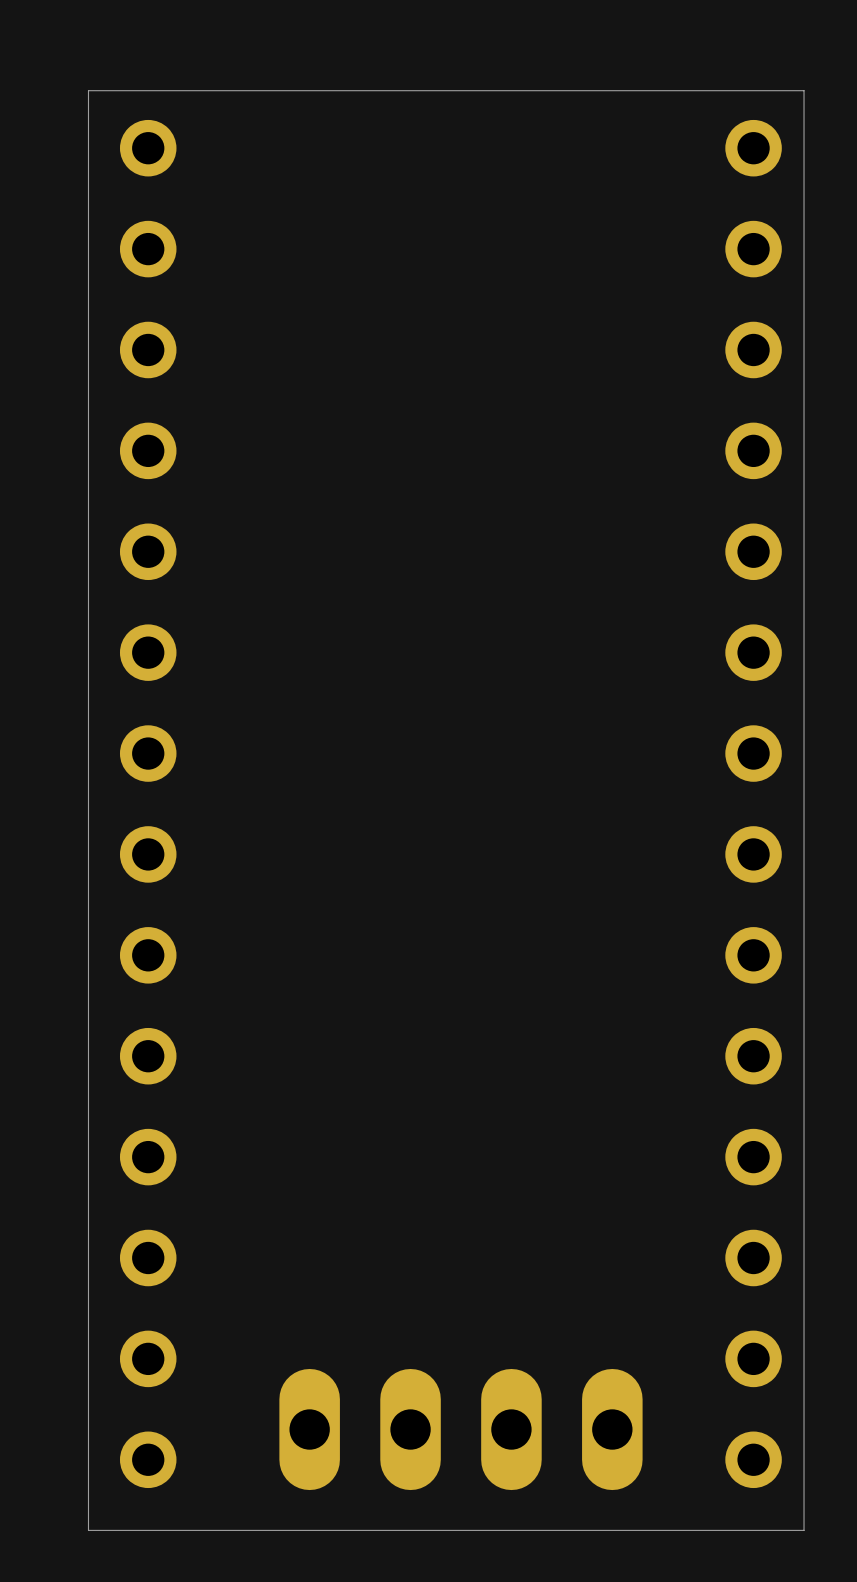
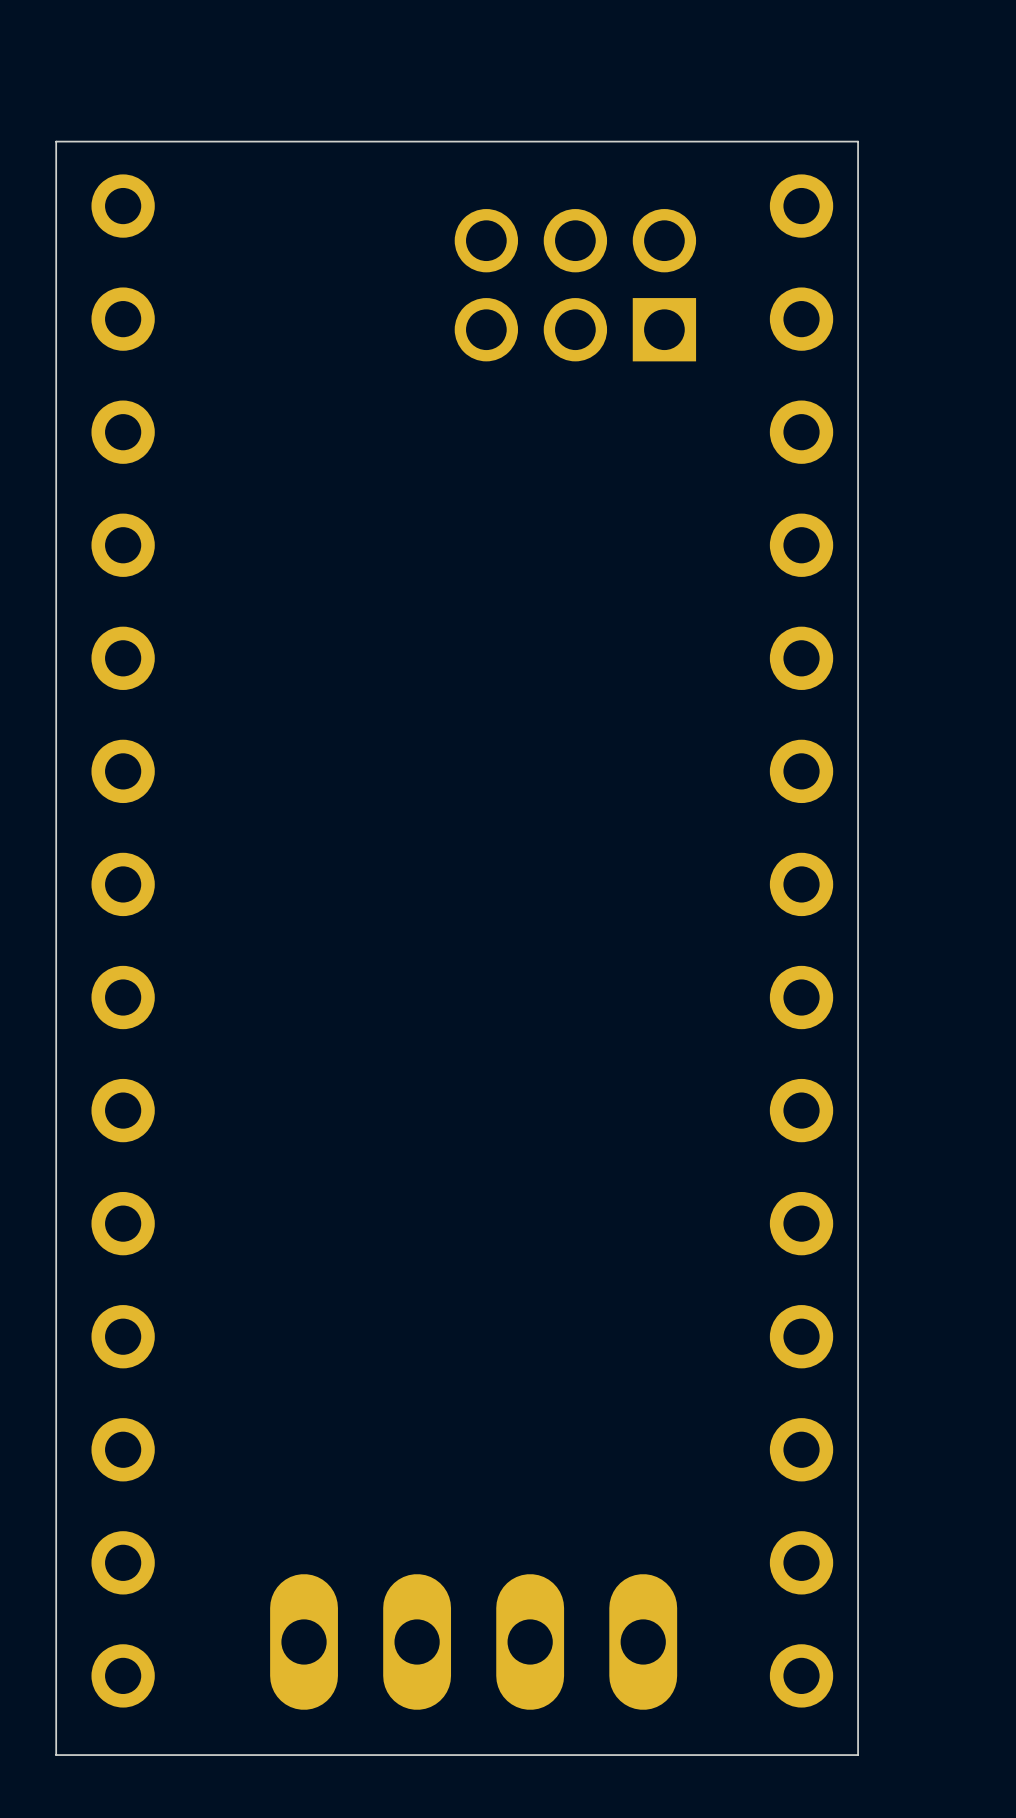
part: none -> (575, 285)

